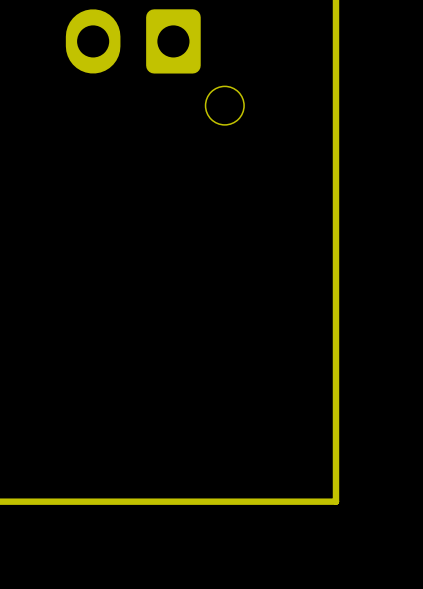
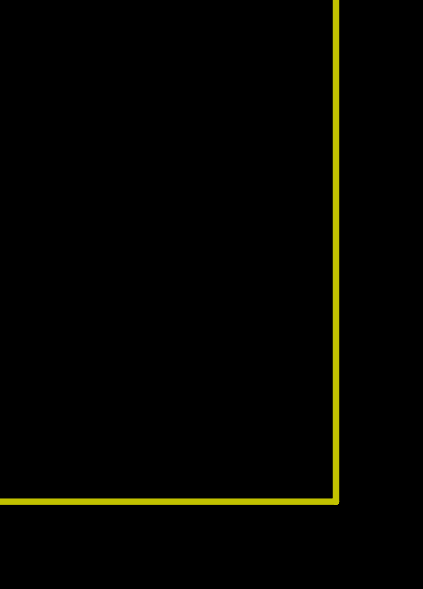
part: (154, 67) -> none

